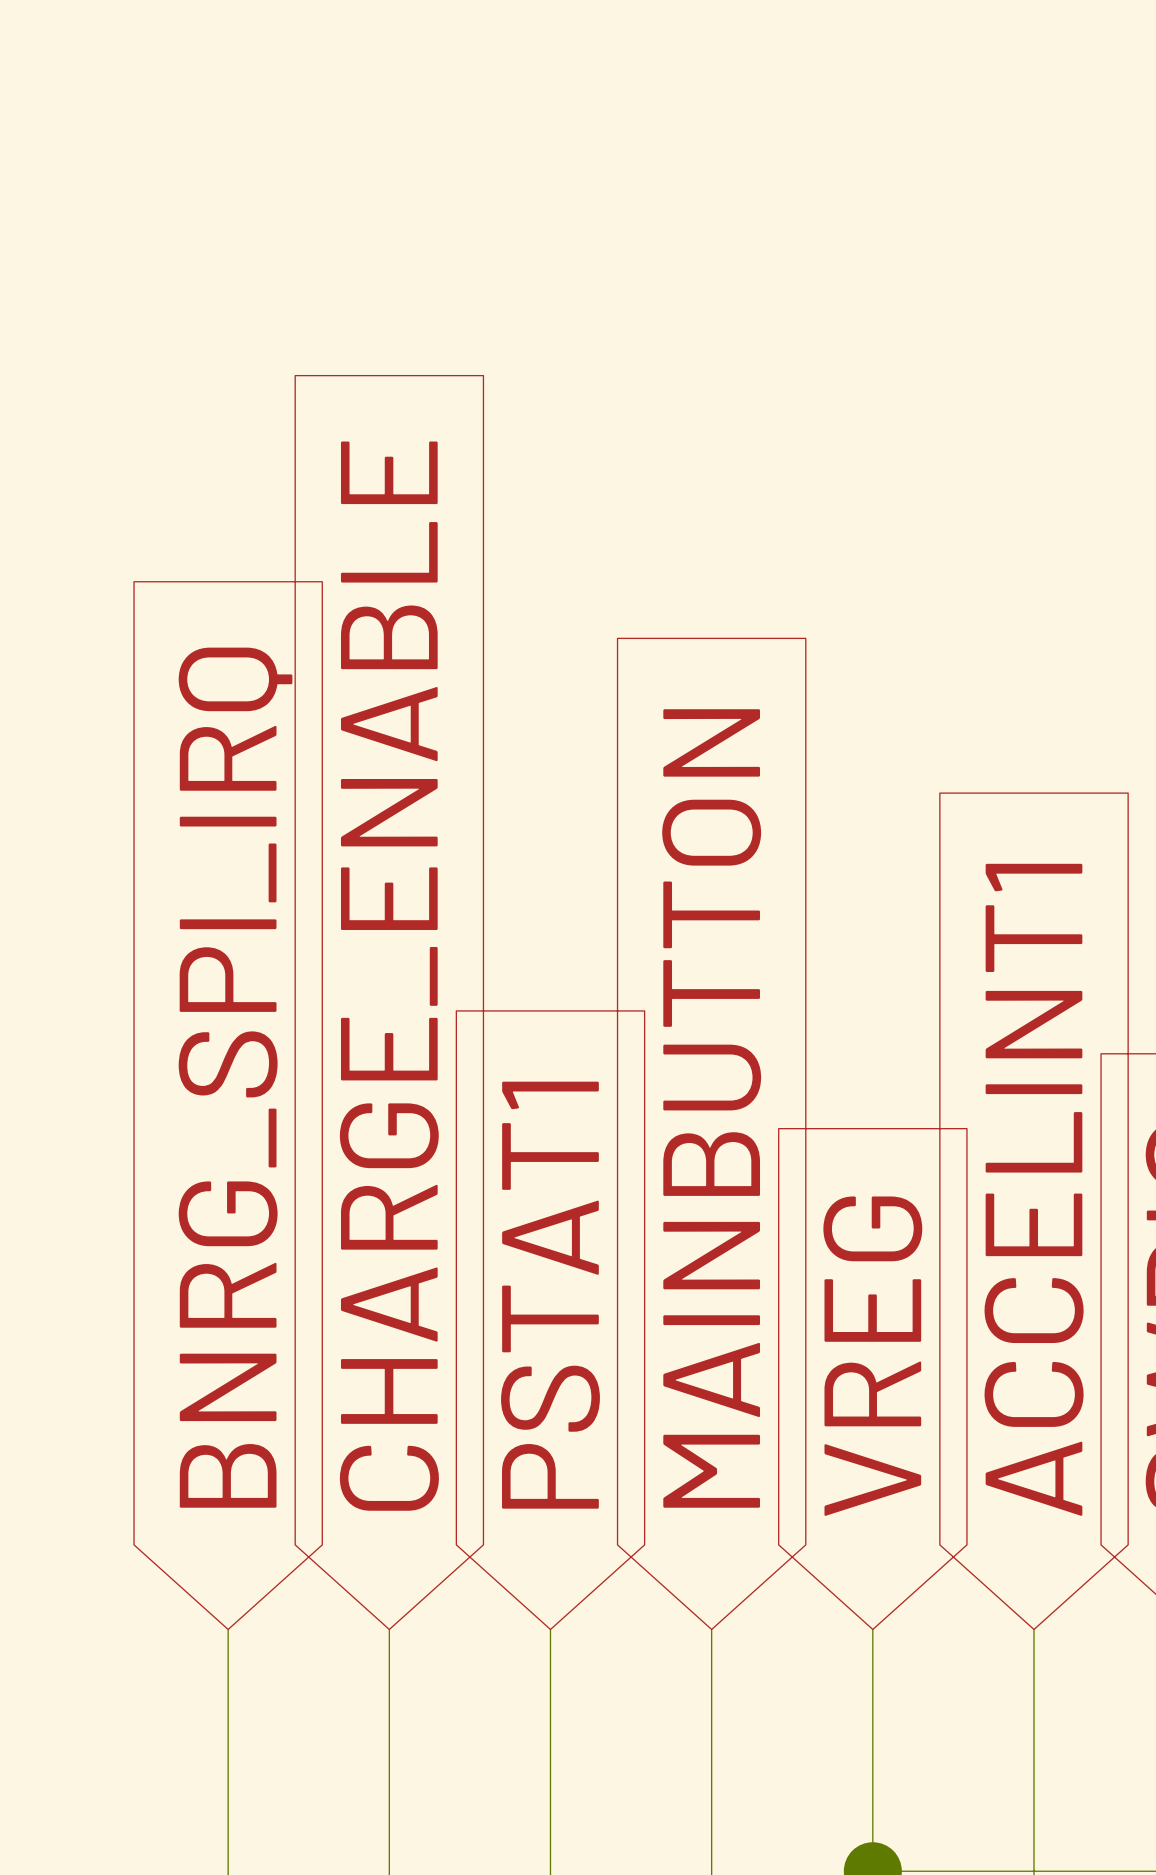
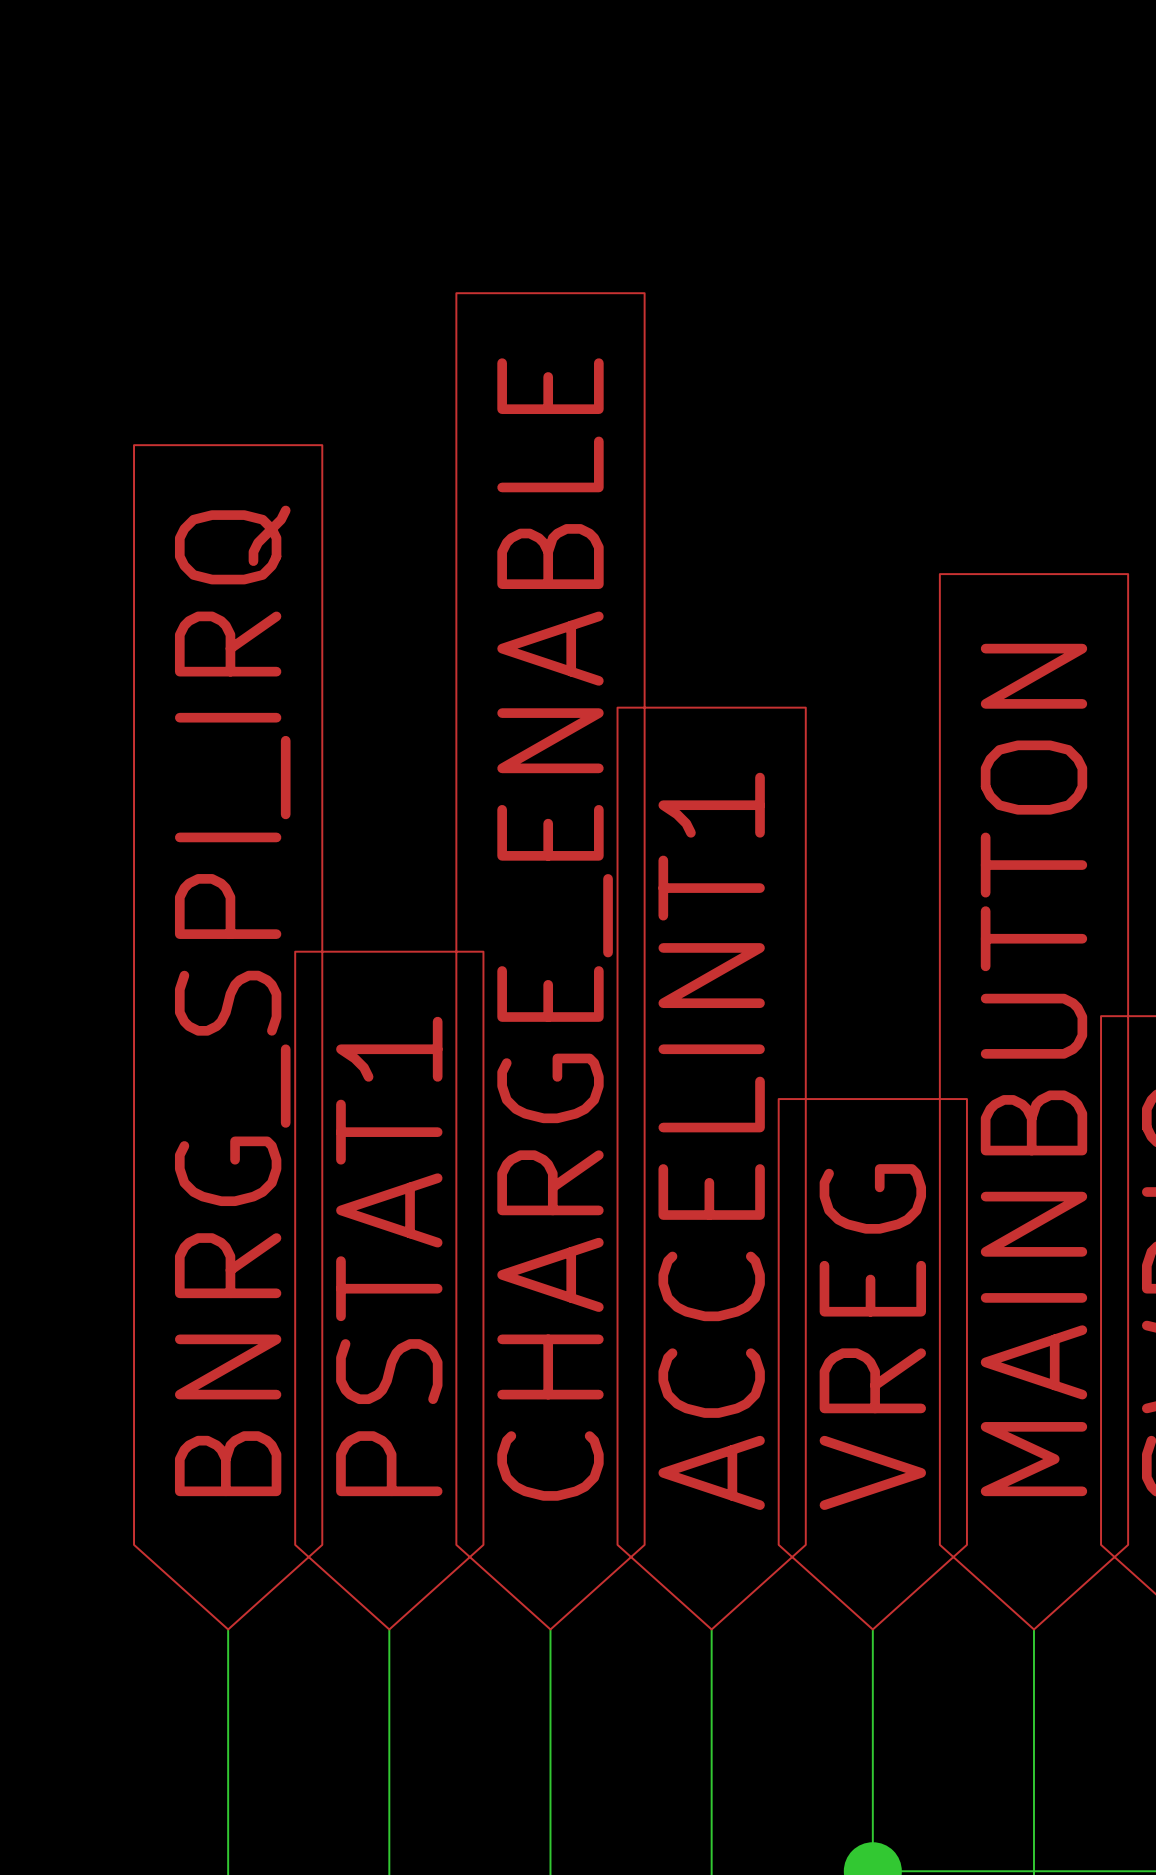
global label: CHARGE_ENABLE (389, 976) -> PSTAT1 (389, 1256)
global label: MAINBUTTON (711, 1108) -> ACCELINT1 (711, 1141)
global label: ACCELINT1 (1034, 1189) -> MAINBUTTON (1033, 1069)
global label: PSTAT1 (550, 1295) -> CHARGE_ENABLE (555, 929)

